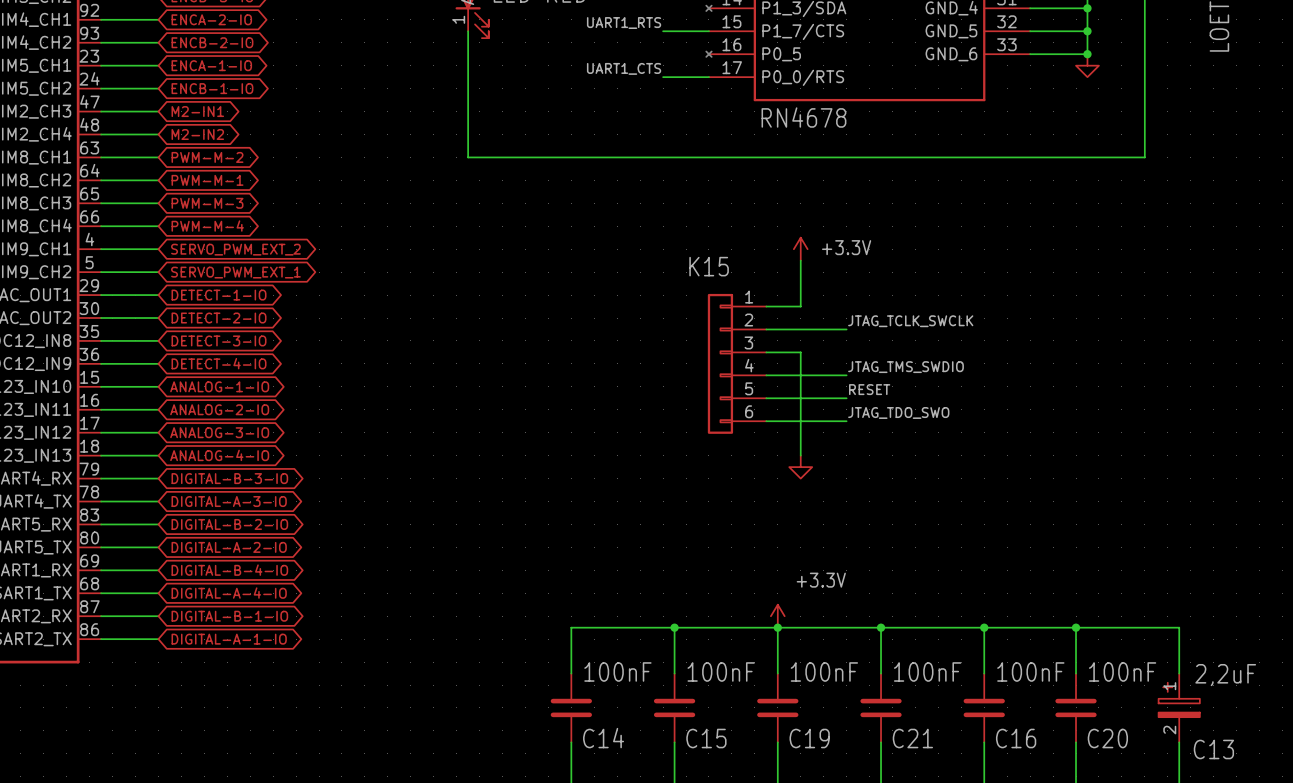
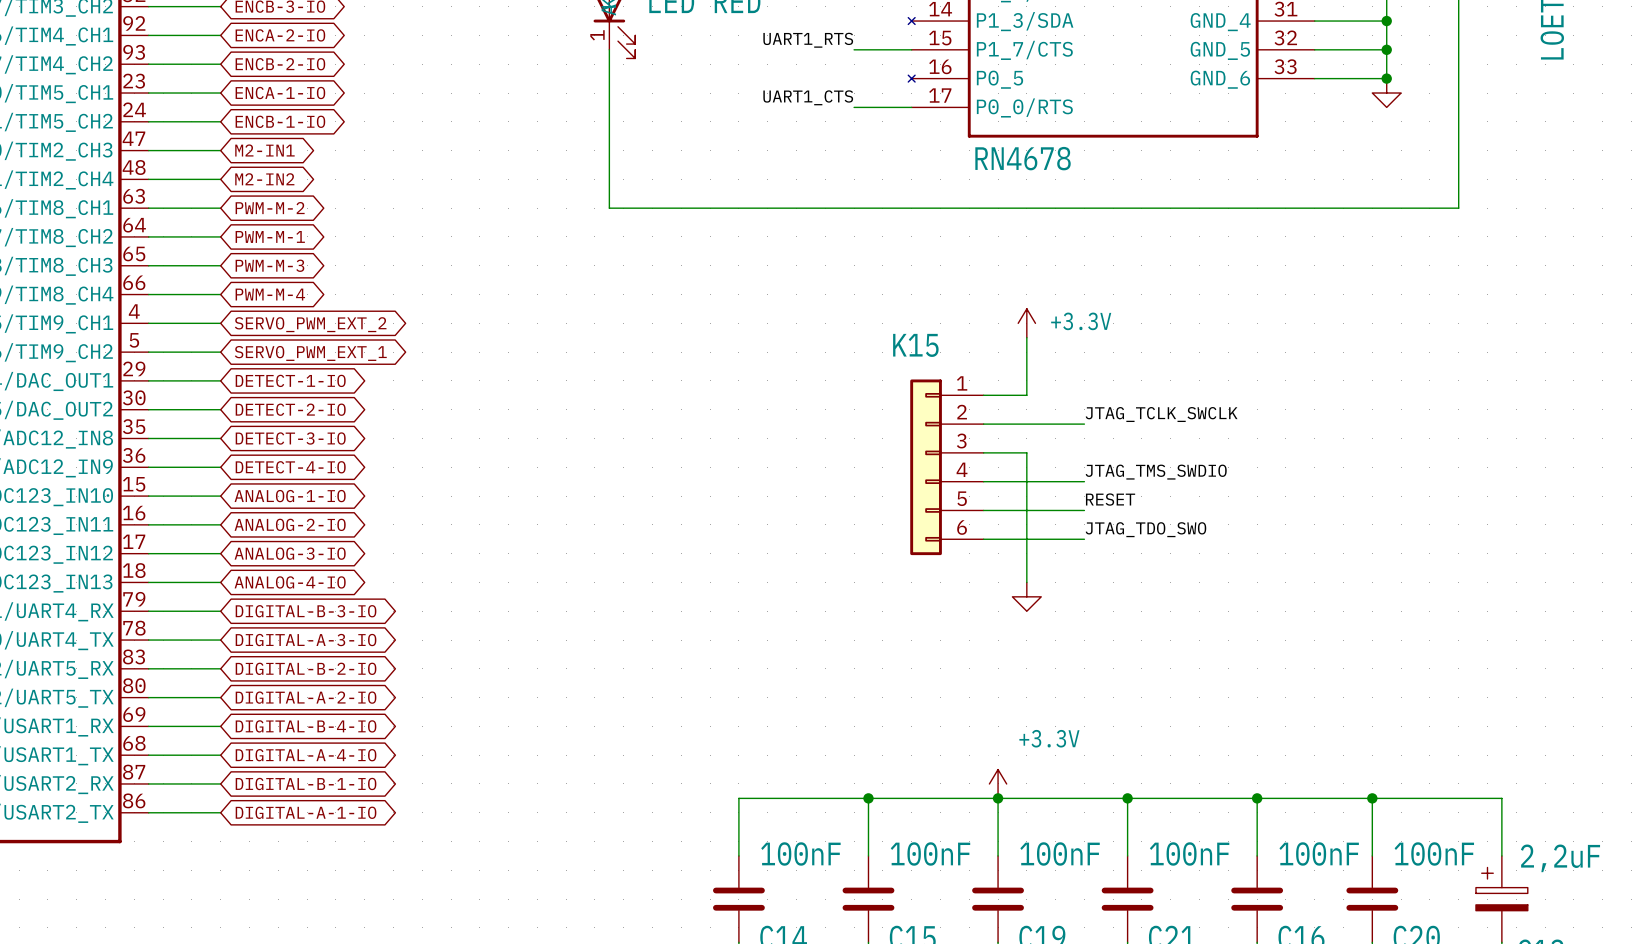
C13 pin number: 1 (1169, 686) -> none
C13 pin number: 2 (1169, 730) -> none

